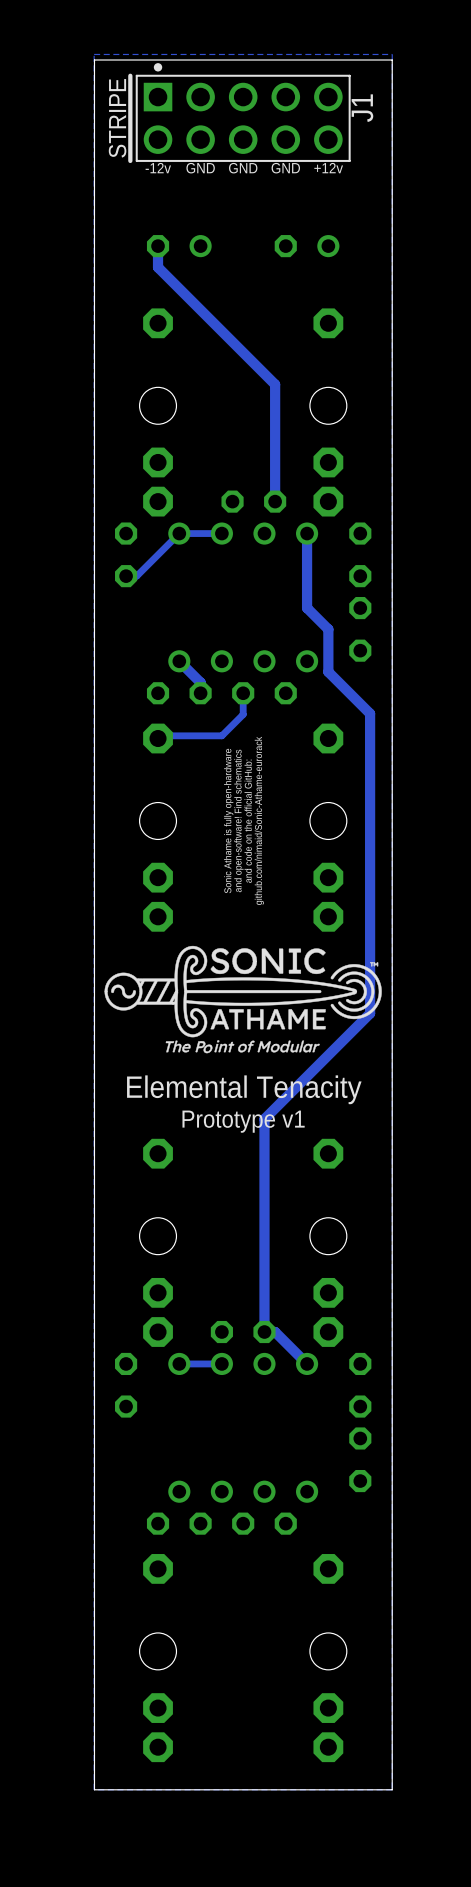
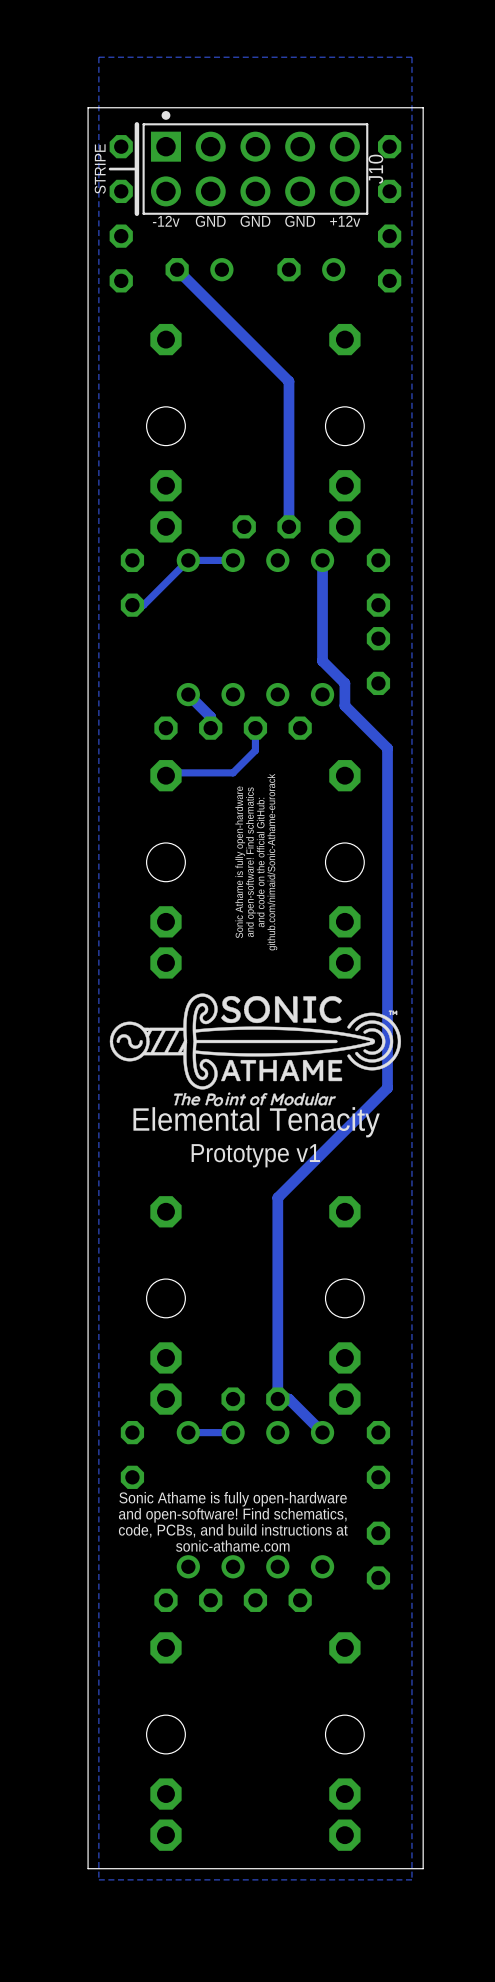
board edge: (392, 60) (94, 60) (94, 1789) (392, 1789) (392, 60) -> (423, 107) (423, 1868) (88, 1868) (88, 107) (423, 107)
J1: (239, 113) -> none
J10: none -> (251, 163)
text: none -> STRIPE (100, 169)
part: none -> (121, 169)
line: none -> (136, 169) (110, 169)
part: none -> (389, 169)
part: none -> (121, 258)
track: (158, 246) (158, 267) (275, 384) -> (177, 269) (288, 381) (288, 403)
part position: (179, 246) -> (199, 269)
part position: (307, 246) -> (311, 269)
part: none -> (389, 258)
track: (307, 608) (328, 629) (328, 650) -> (322, 638) (322, 661) (344, 683)
track: (368, 712) (370, 1013) (264, 1119) (264, 1140) -> (387, 748) (387, 1088) (277, 1197)
text position: Elemental Tenacity (244, 1089) -> Elemental Tenacity (256, 1122)
text position: Prototype v1 (243, 1121) -> Prototype v1 (255, 1155)
text: none -> Sonic Athame is fully open-hardware (233, 1499)
text: none -> and open-software! Find schematics, (232, 1515)
text: none -> code, PCBs, and build instructions at (233, 1530)
part position: (360, 1459) -> (378, 1555)
text: none -> sonic-athame.com (232, 1546)

